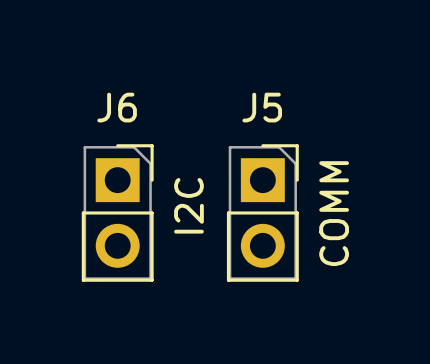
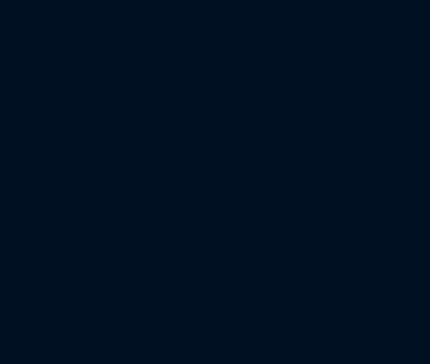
J6: I2C (117, 212) -> none
J5: COMM (262, 212) -> none

